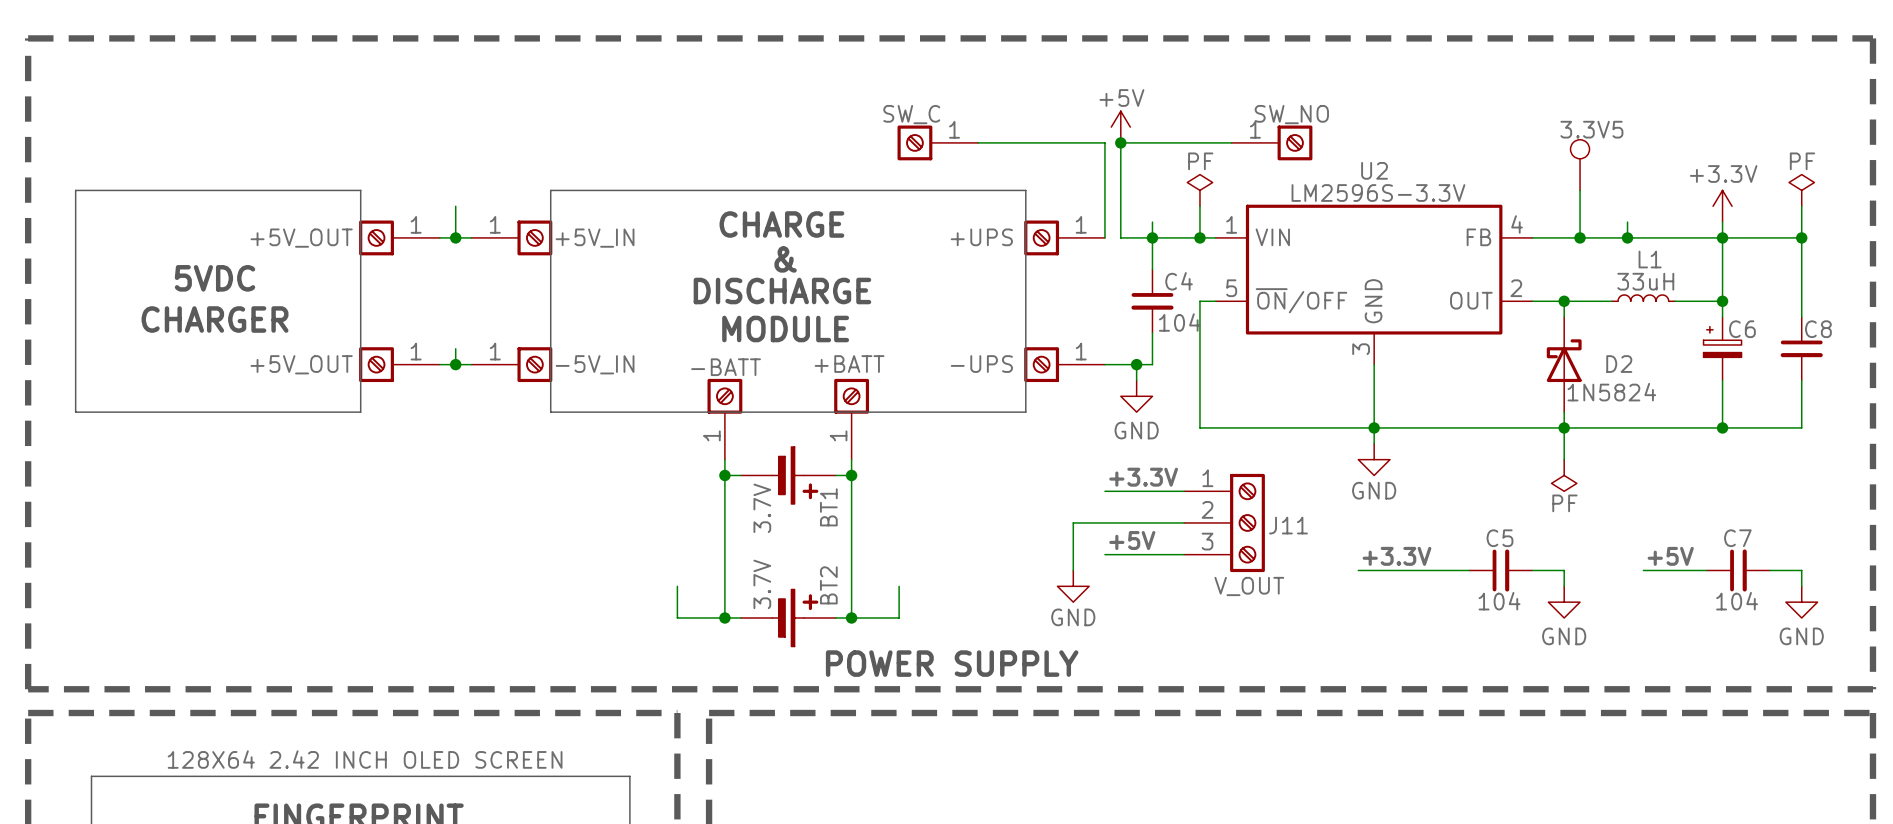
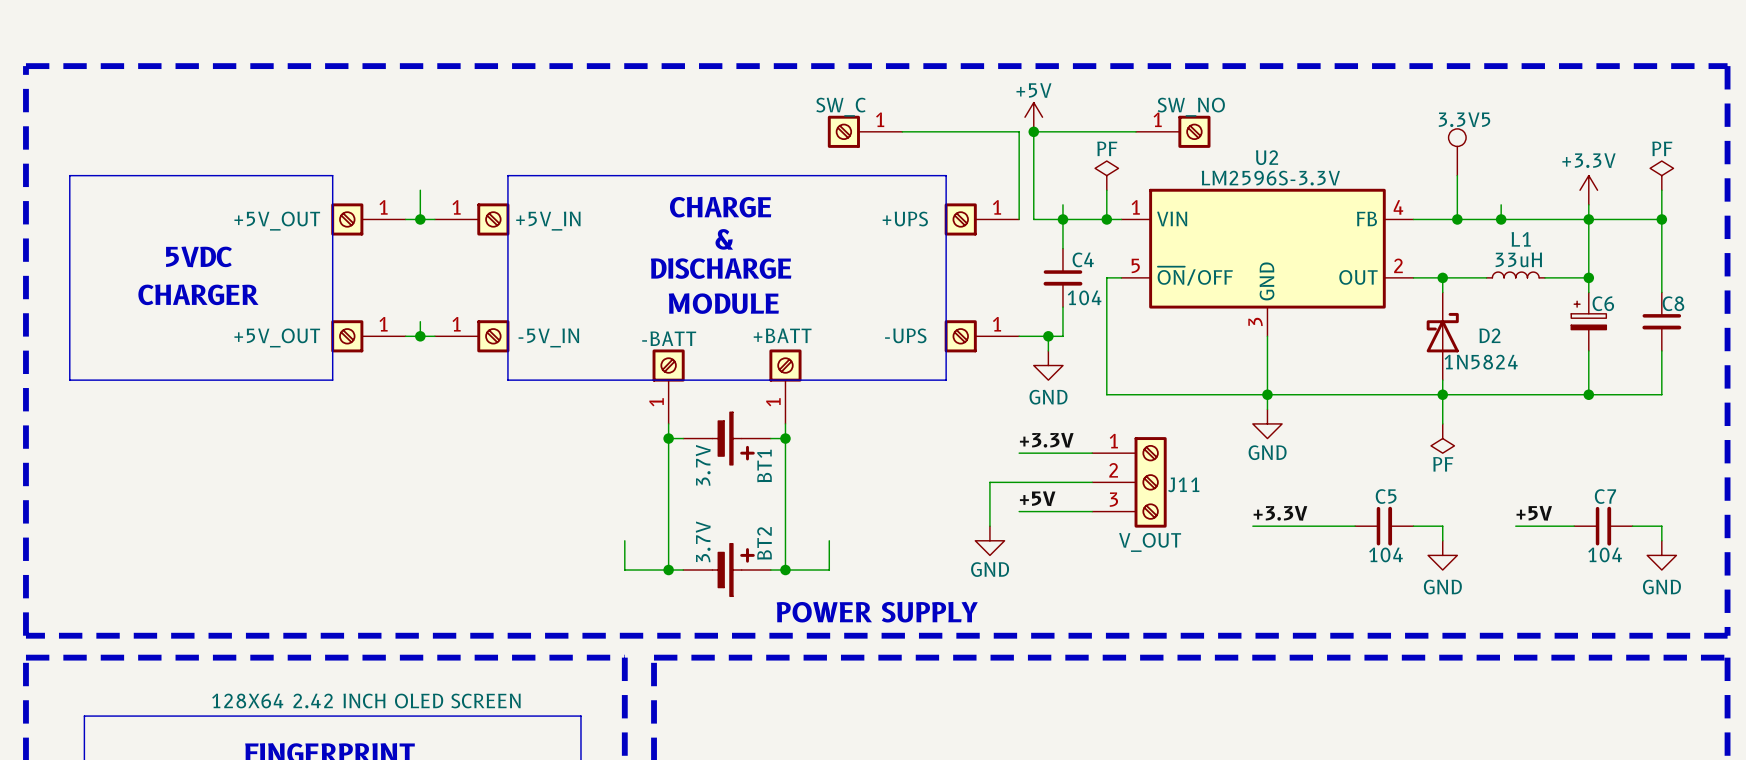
line: (28, 71) (28, 38) (1872, 38) (1872, 689) -> (25, 66) (1727, 66) (1727, 635)

